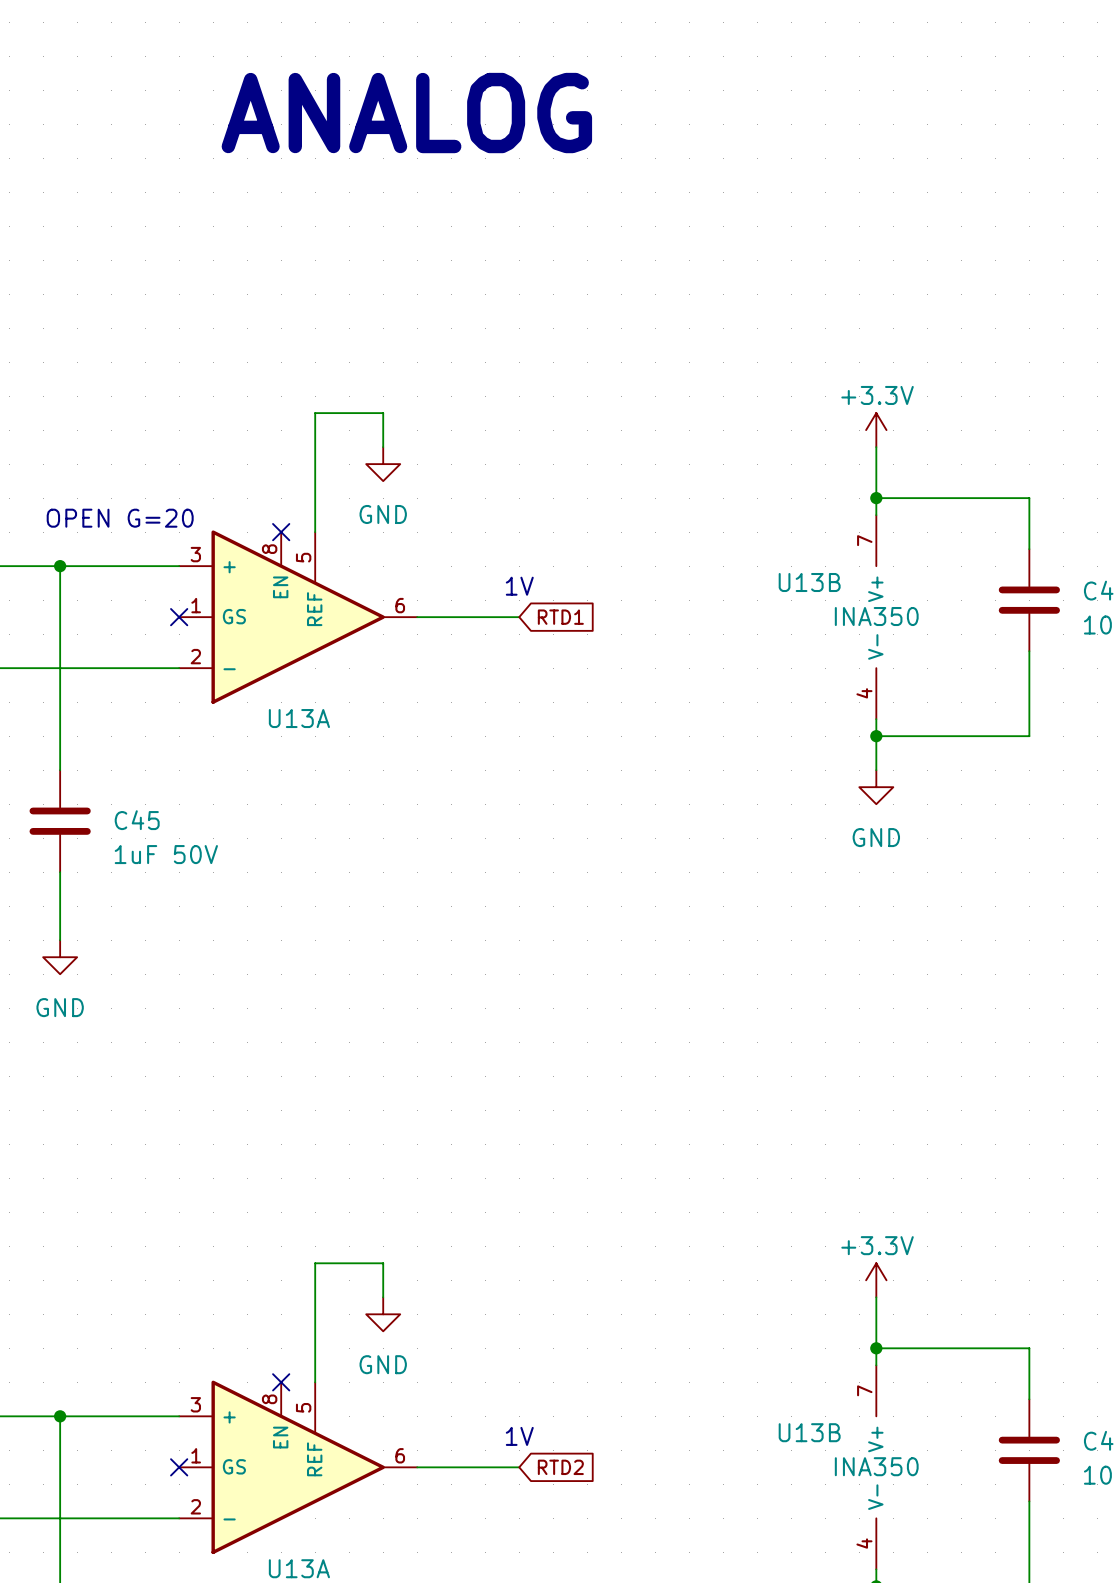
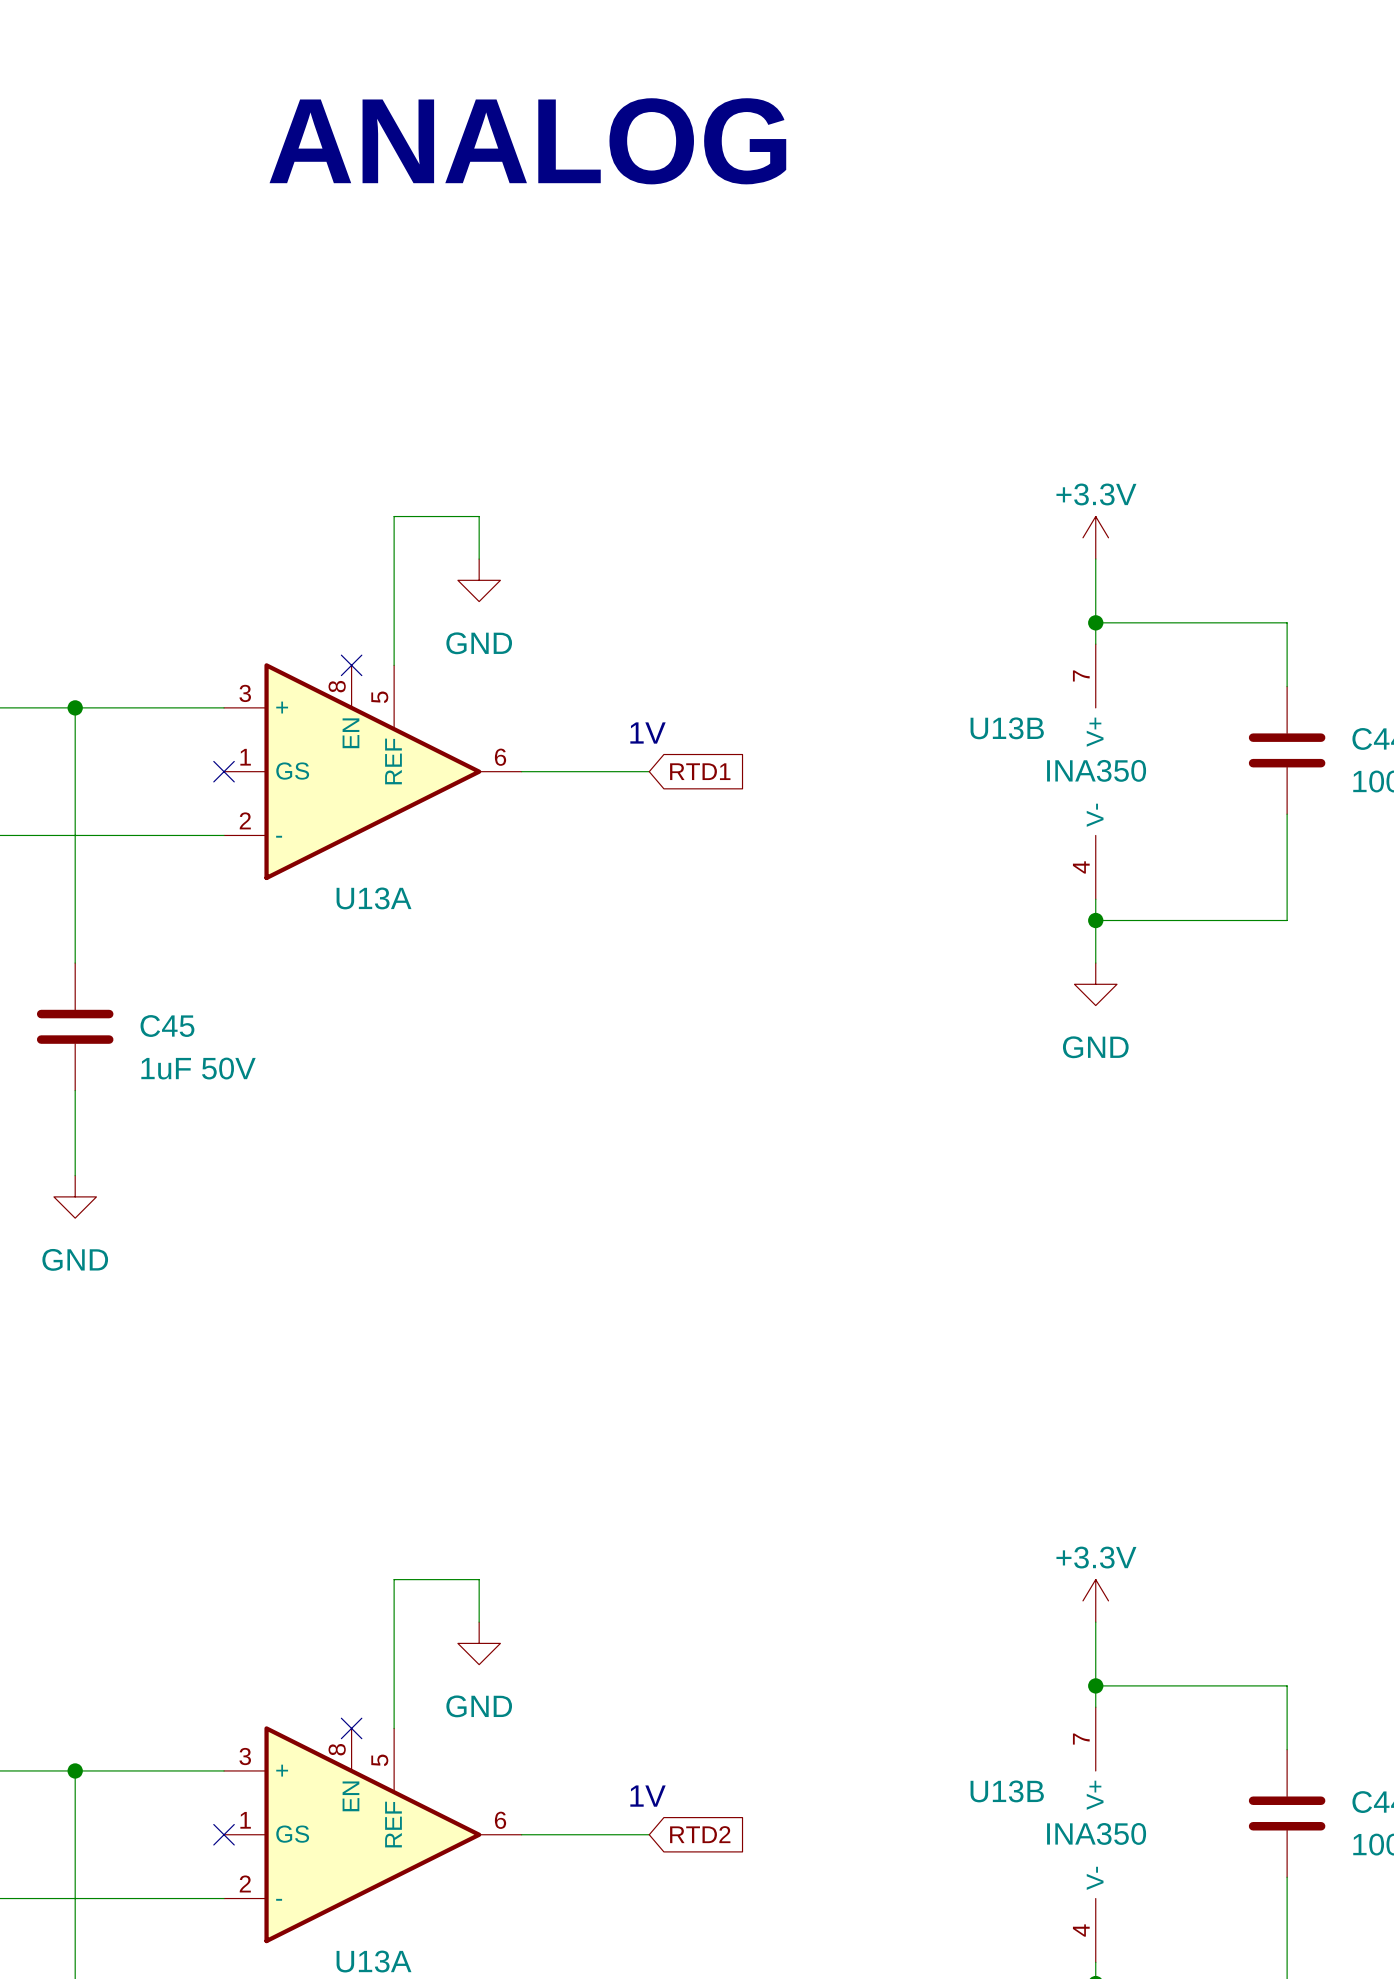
text: OPEN G=20 (120, 518) -> none

